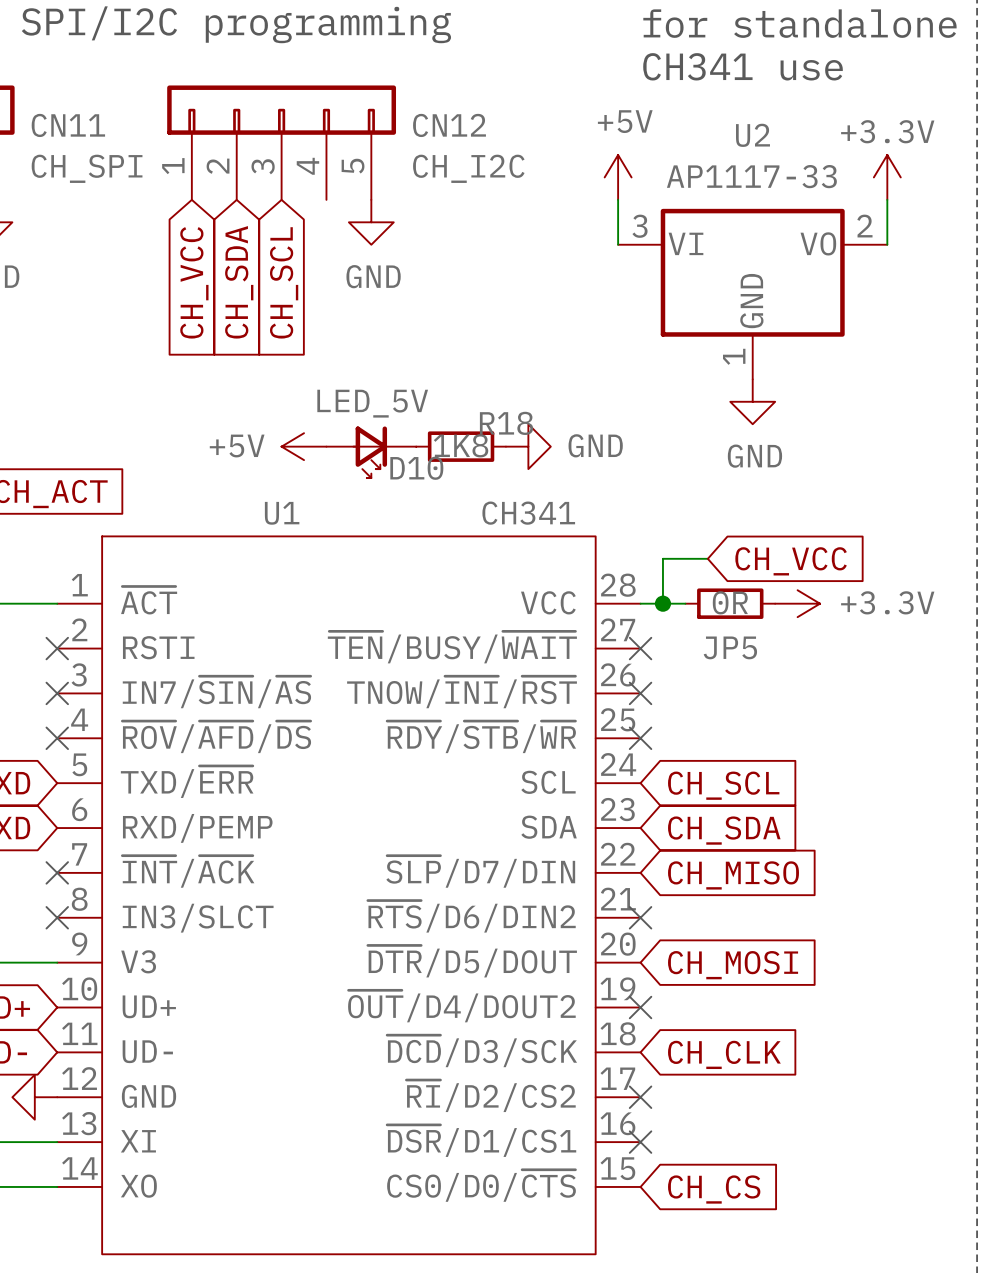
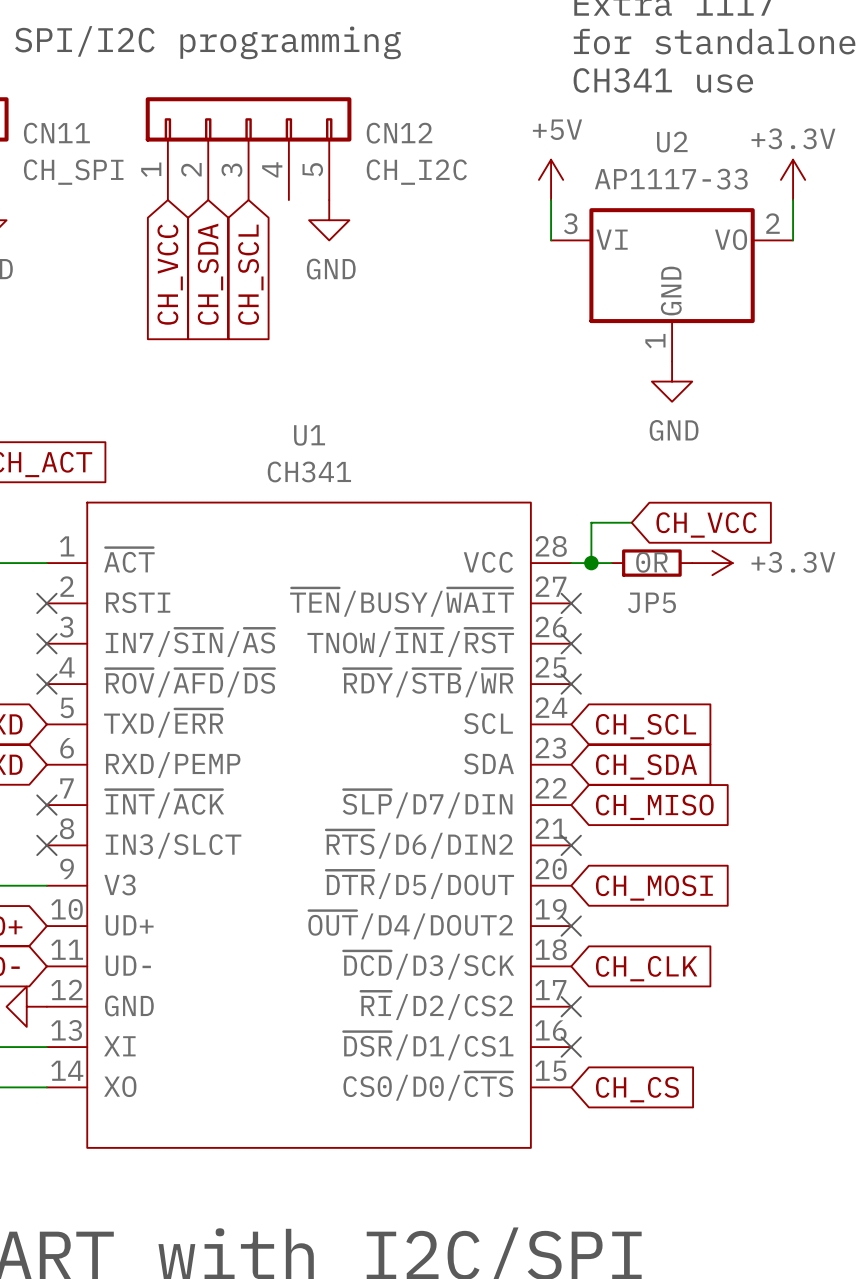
power symbol: +5V (304, 446) -> none
R18: 1K8 (461, 446) -> none
power symbol: GND (528, 446) -> none
D10: LED_5V (371, 452) -> none
U1 name position: U1 (282, 513) -> U1 (309, 435)
U1 value position: CH341 (528, 513) -> CH341 (309, 471)

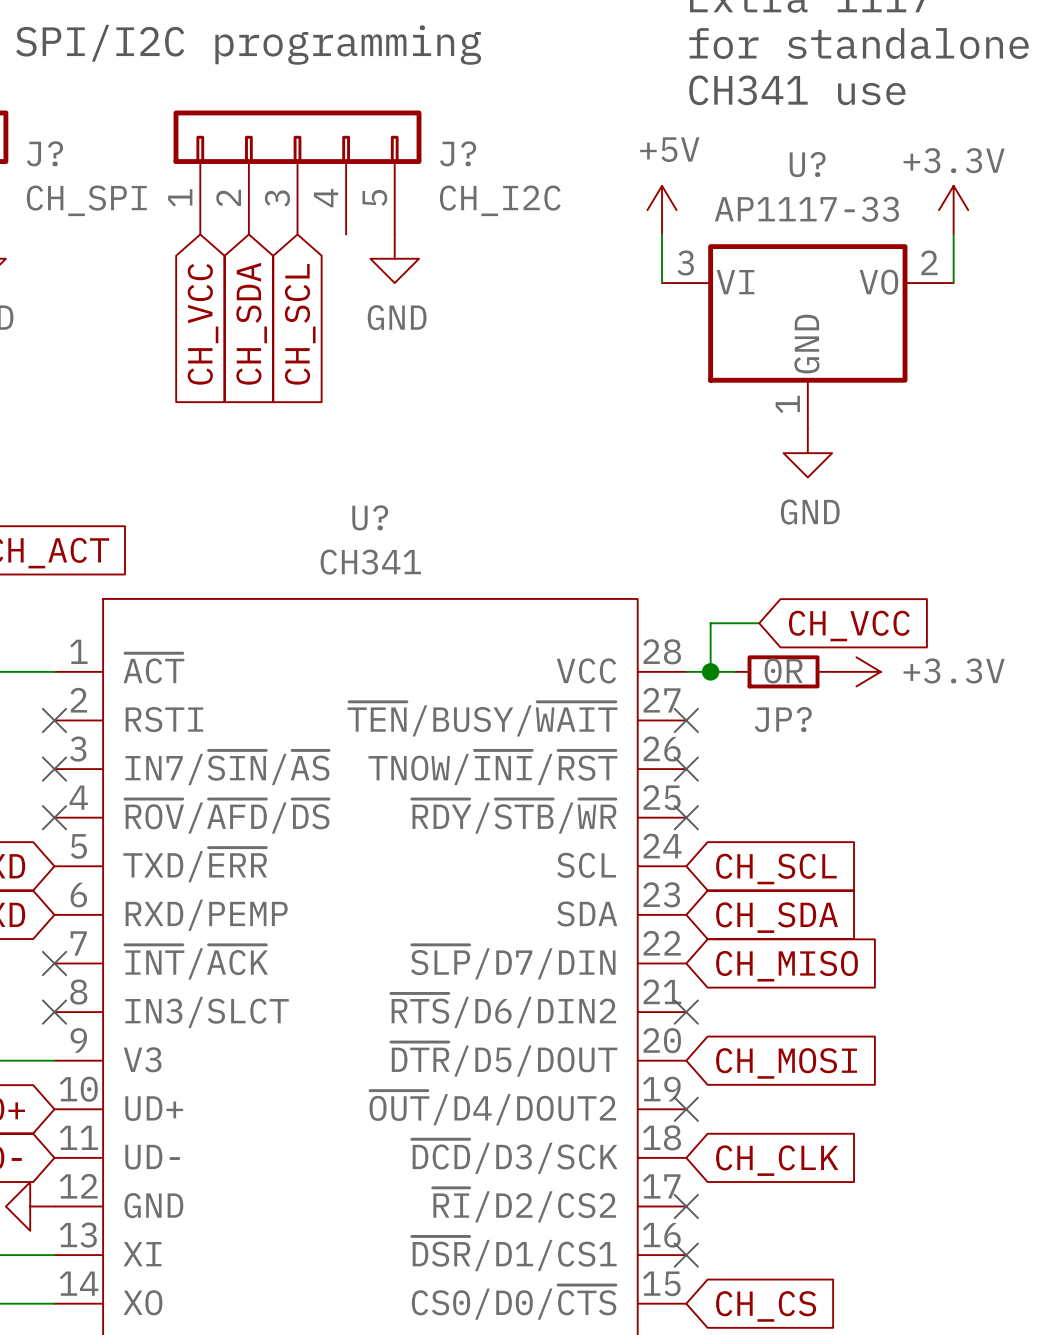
CN11 name: CN11 (56, 133) -> J? (44, 153)
CN12 name: CN12 (399, 133) -> J? (458, 153)
U2 name: U2 (672, 142) -> U? (807, 164)
U1 name: U1 (309, 435) -> U? (370, 517)
JP5 name: JP5 (652, 602) -> JP? (783, 719)

